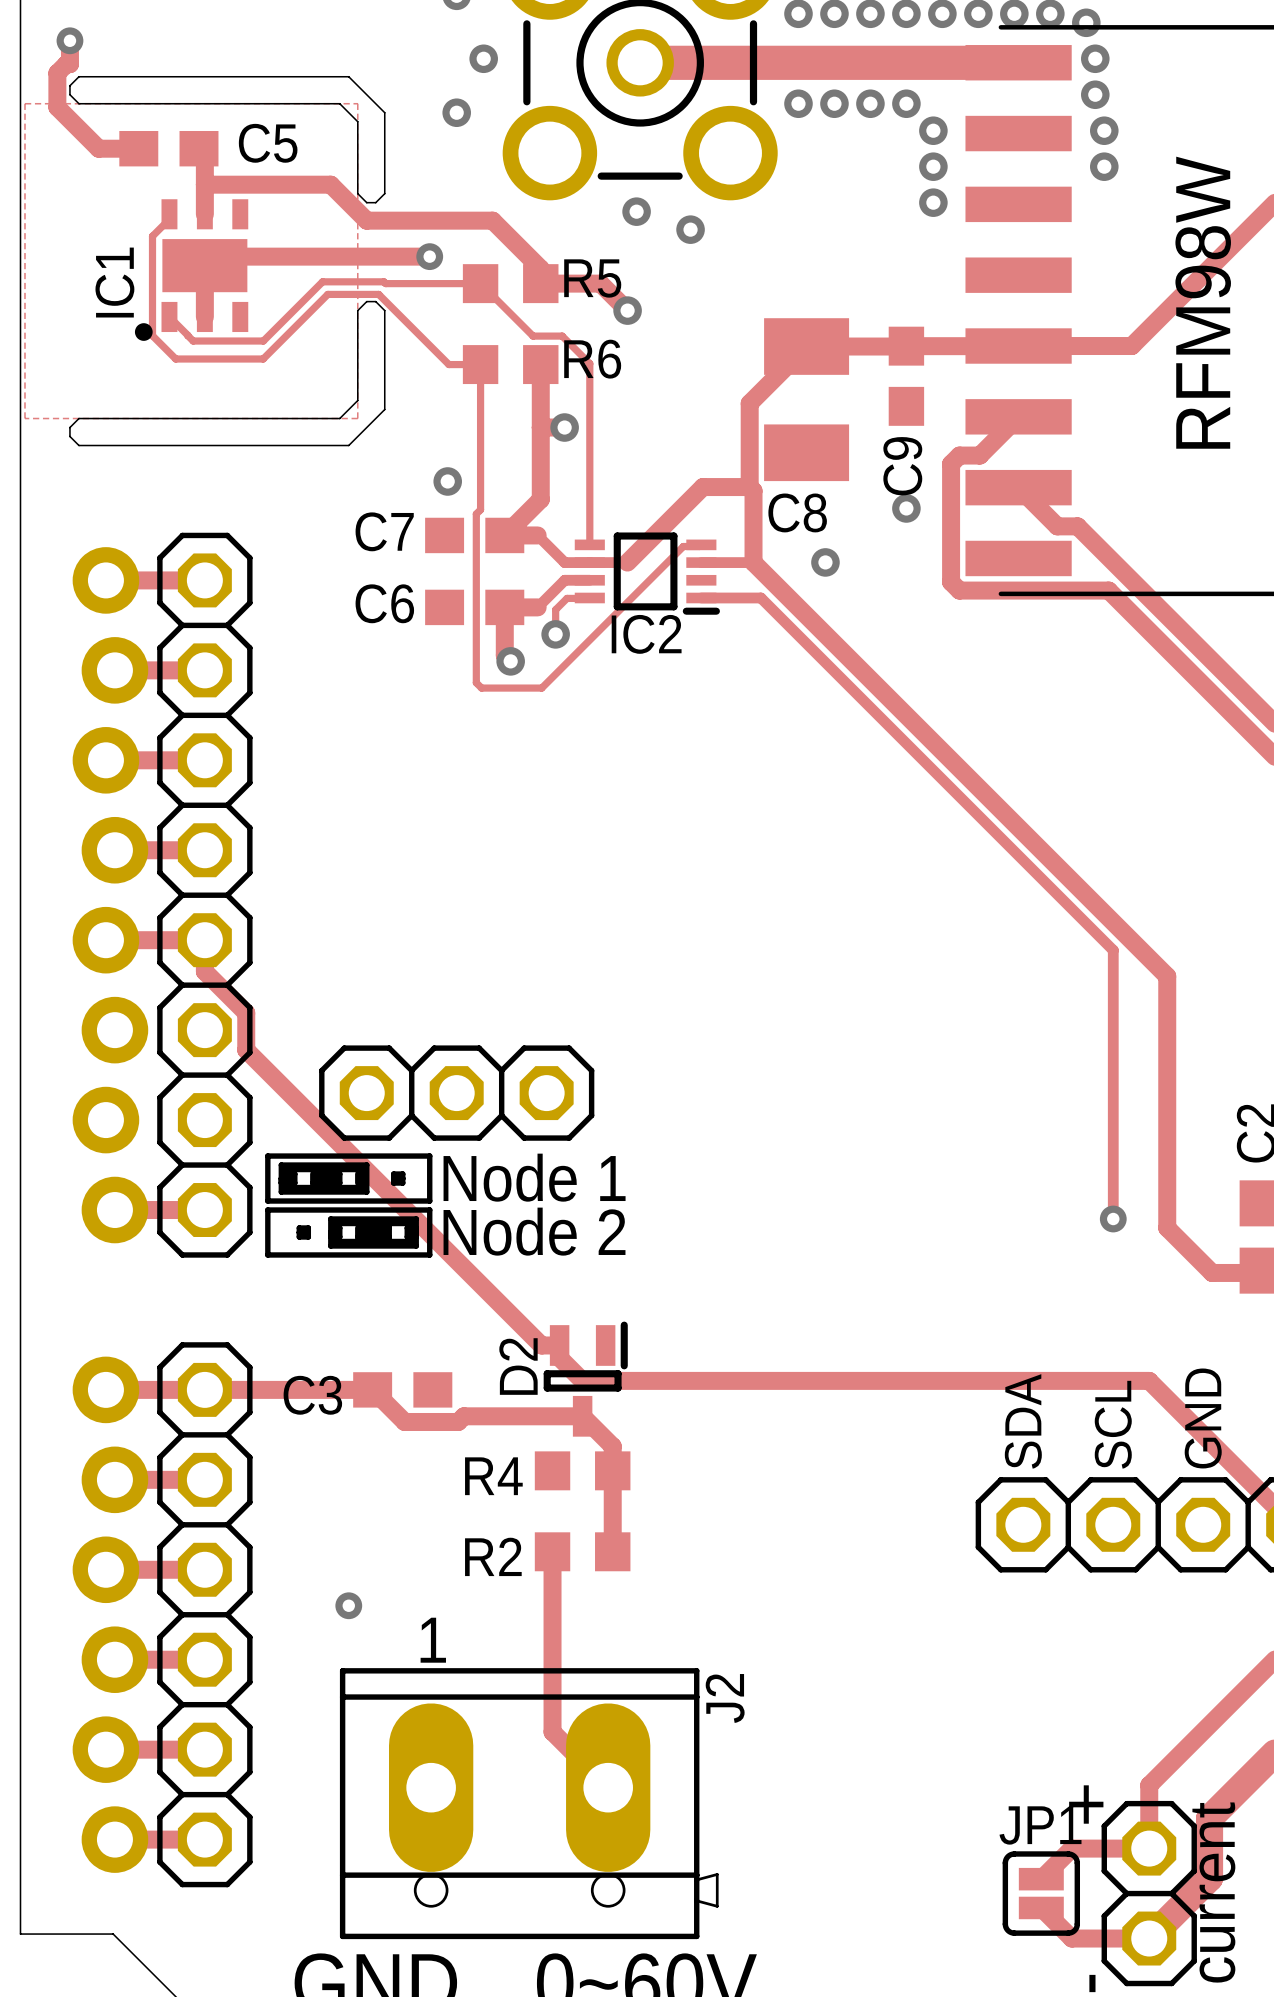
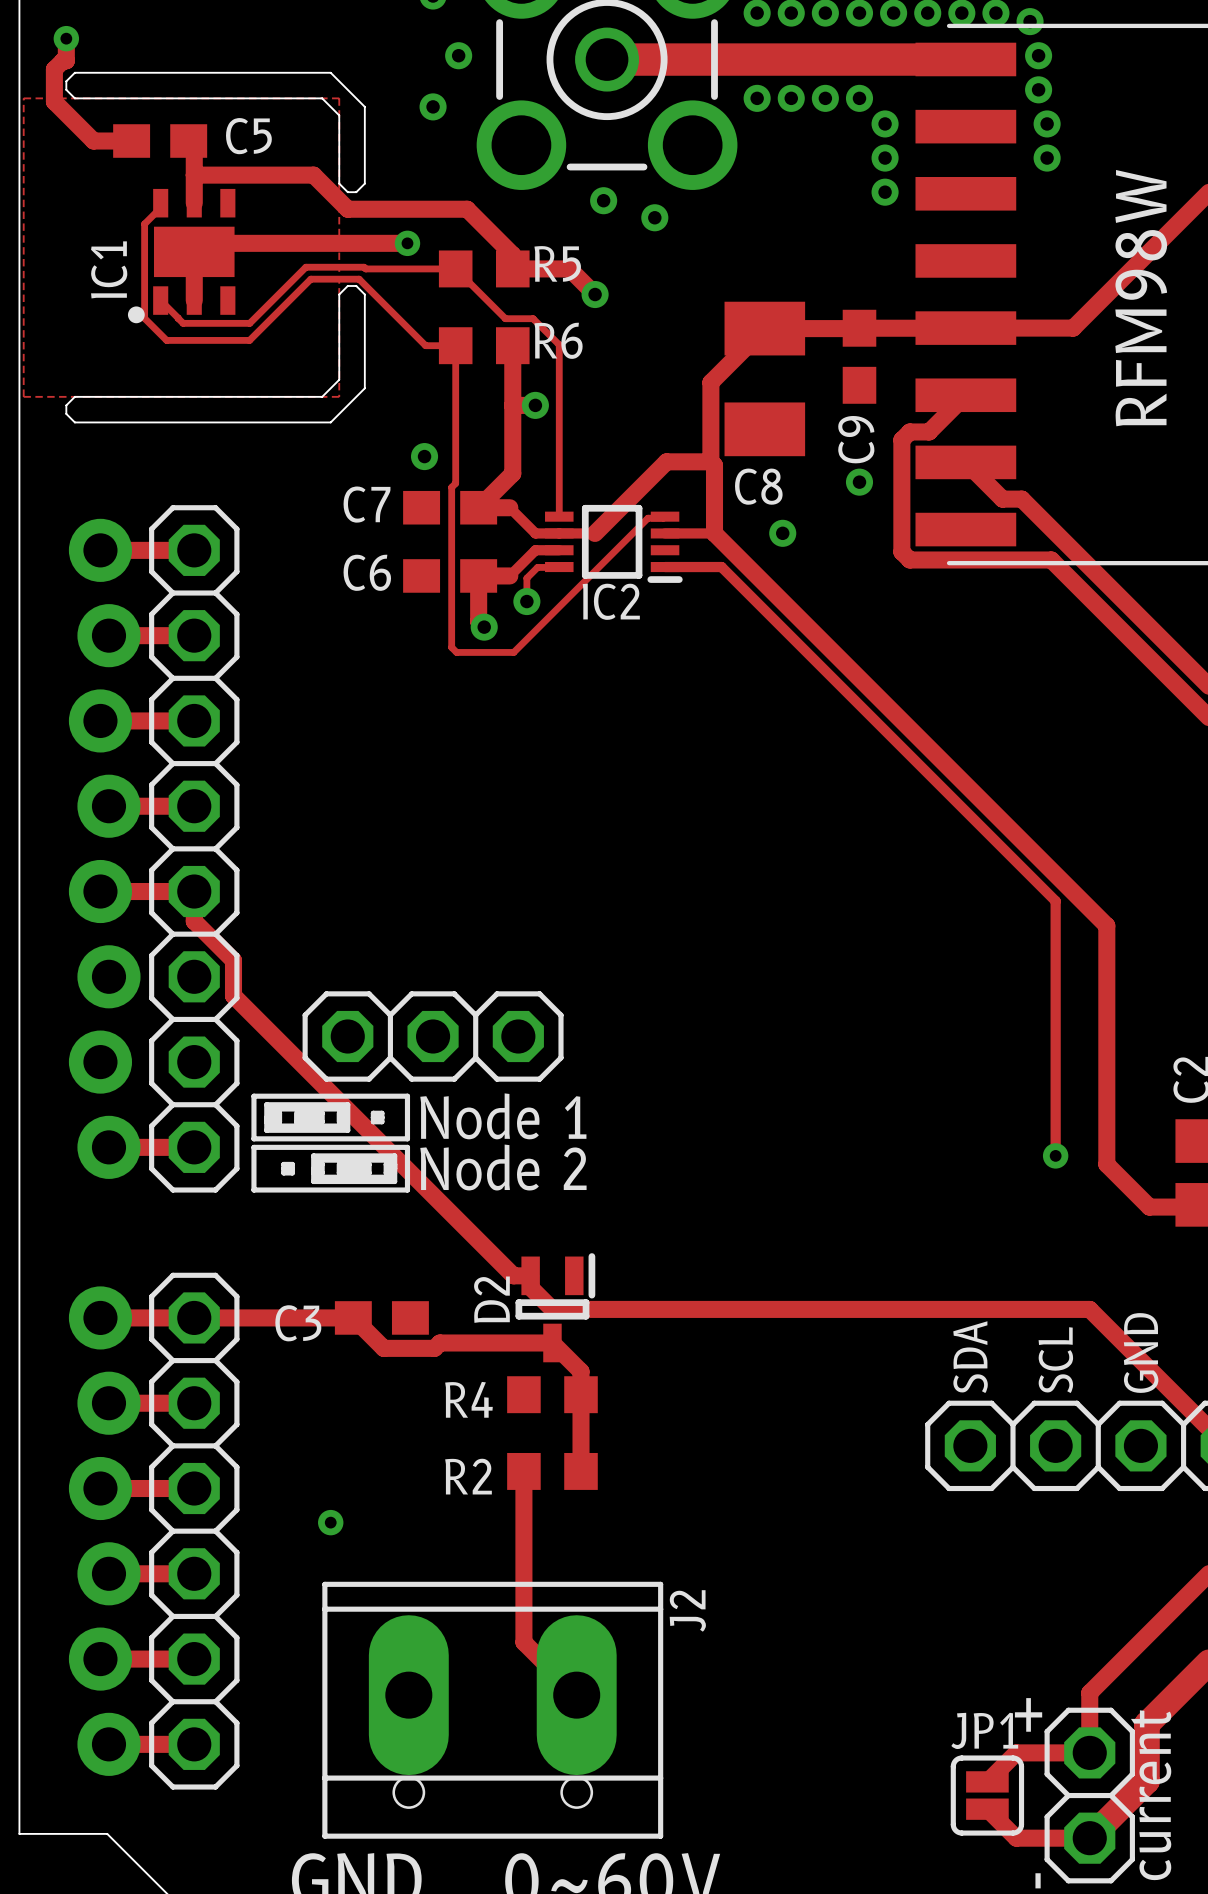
J2 footprint: [339, 1668, 719, 1940] -> [322, 1581, 664, 1839]

